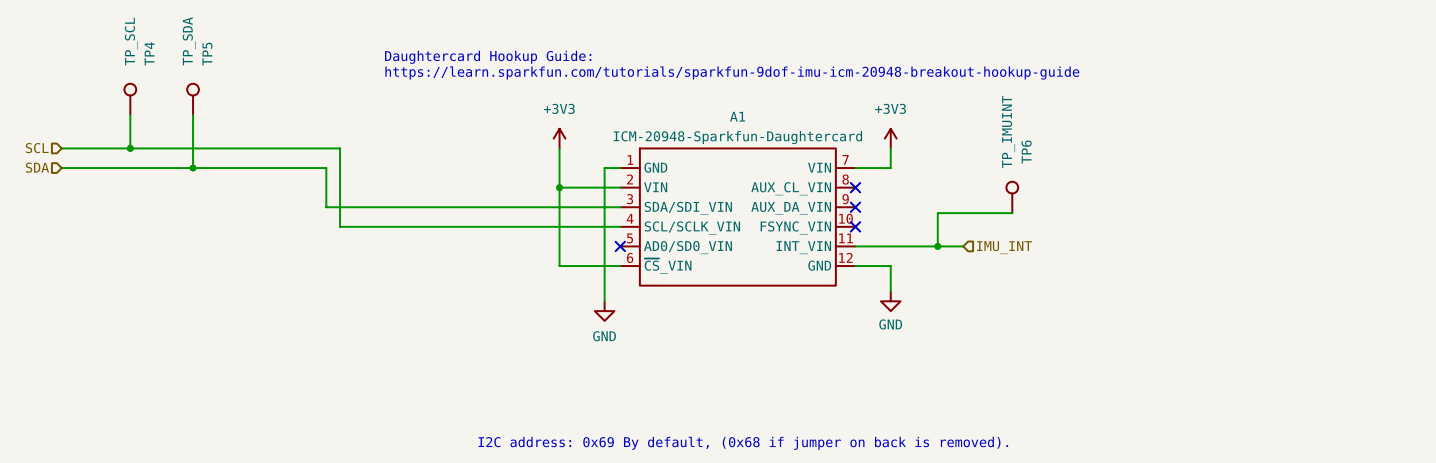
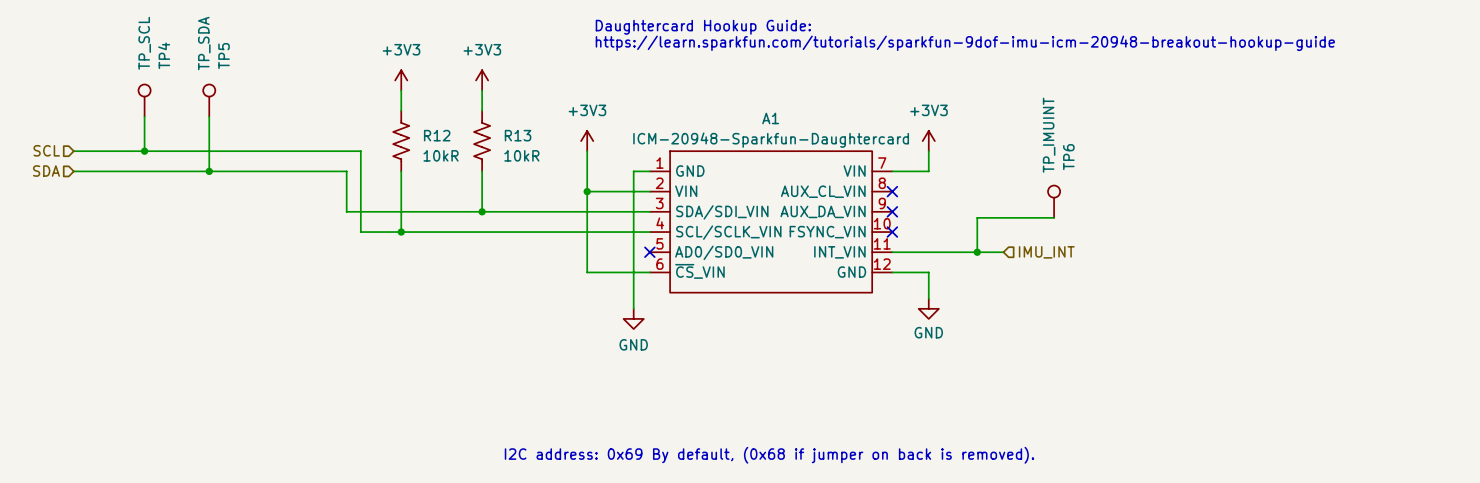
text position: Daughtercard Hookup Guide: (488, 57) -> Daughtercard Hookup Guide: (703, 27)
text position: https://learn.sparkfun.com/tutorials/sparkfun-9dof-imu-icm-20948-breakout-hookup-guide (732, 73) -> https://learn.sparkfun.com/tutorials/sparkfun-9dof-imu-icm-20948-breakout-hookup-guide (965, 43)
power symbol: none -> +3V3 (401, 80)
power symbol: none -> +3V3 (482, 80)
wire: none -> (401, 90) (401, 110)
wire: none -> (482, 90) (482, 110)
R12: none -> 10kR (401, 141)
R13: none -> 10kR (482, 141)
wire: none -> (401, 171) (401, 232)
wire: none -> (482, 171) (482, 211)
junction: none -> (482, 211)
junction: none -> (401, 232)

